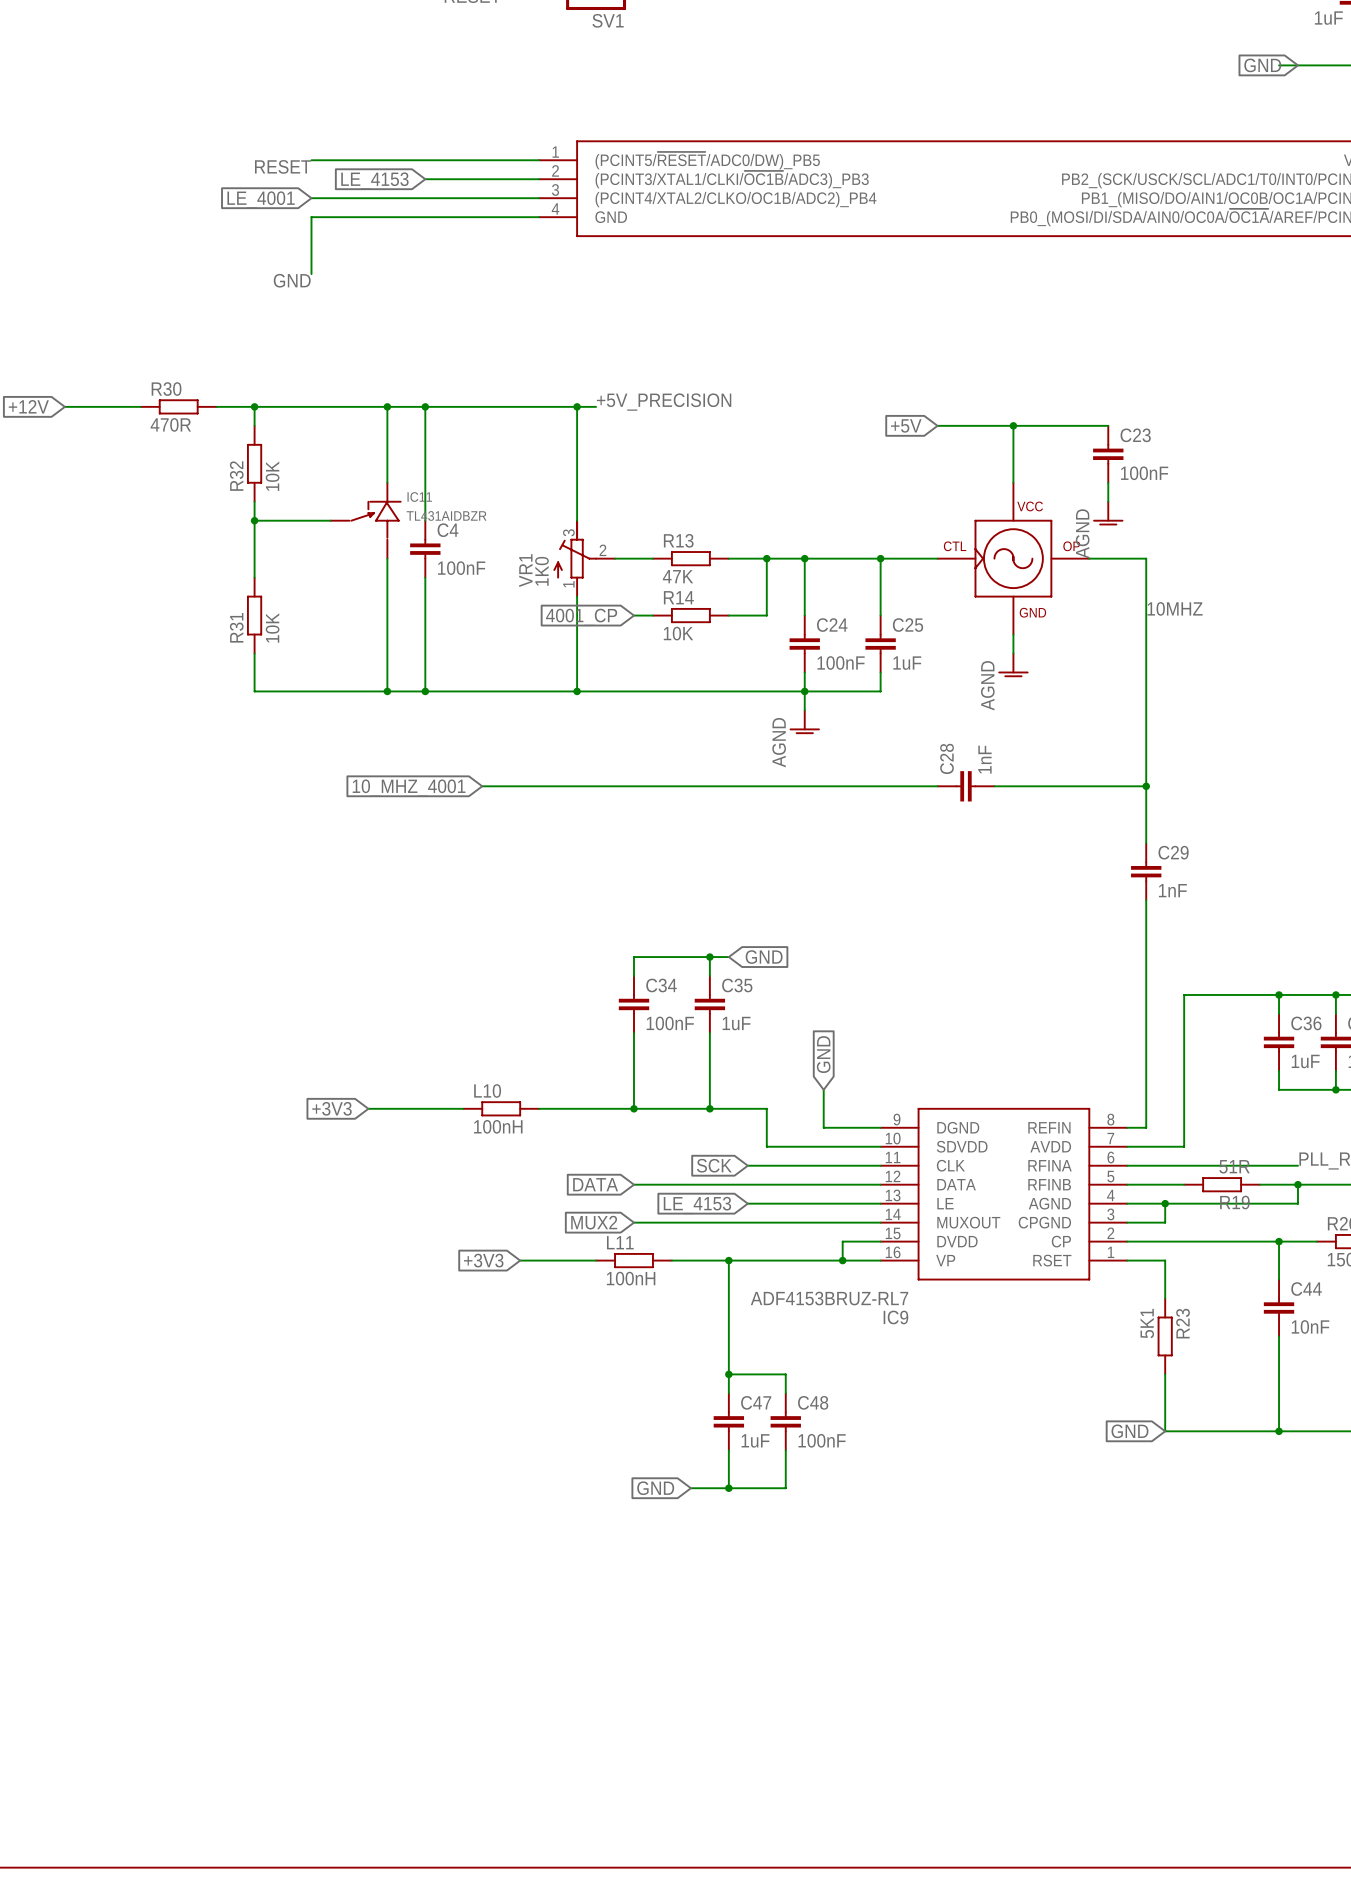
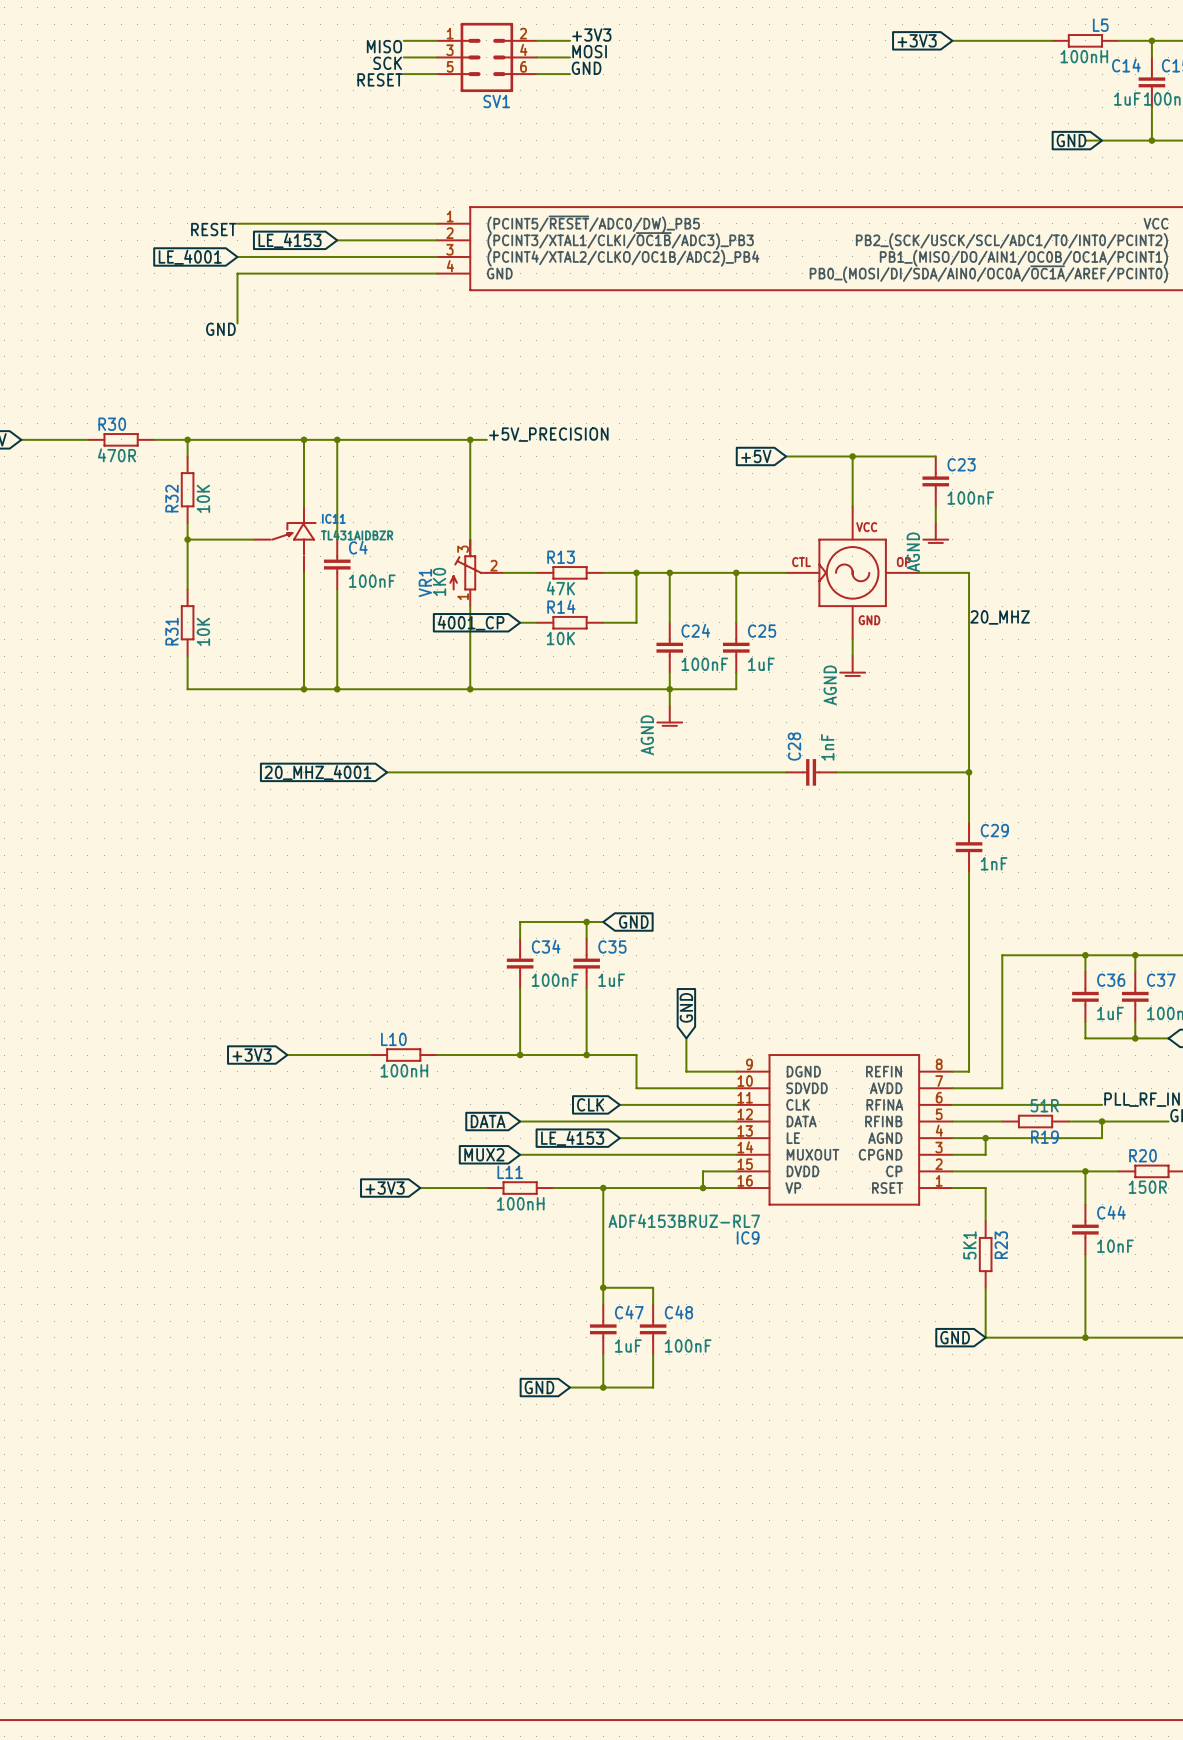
label: 10MHZ (1175, 608) -> 20_MHZ (1000, 617)
global label: 10_MHZ_4001 (409, 788) -> 20_MHZ_4001 (317, 772)
global label: SCK (714, 1165) -> CLK (590, 1104)

